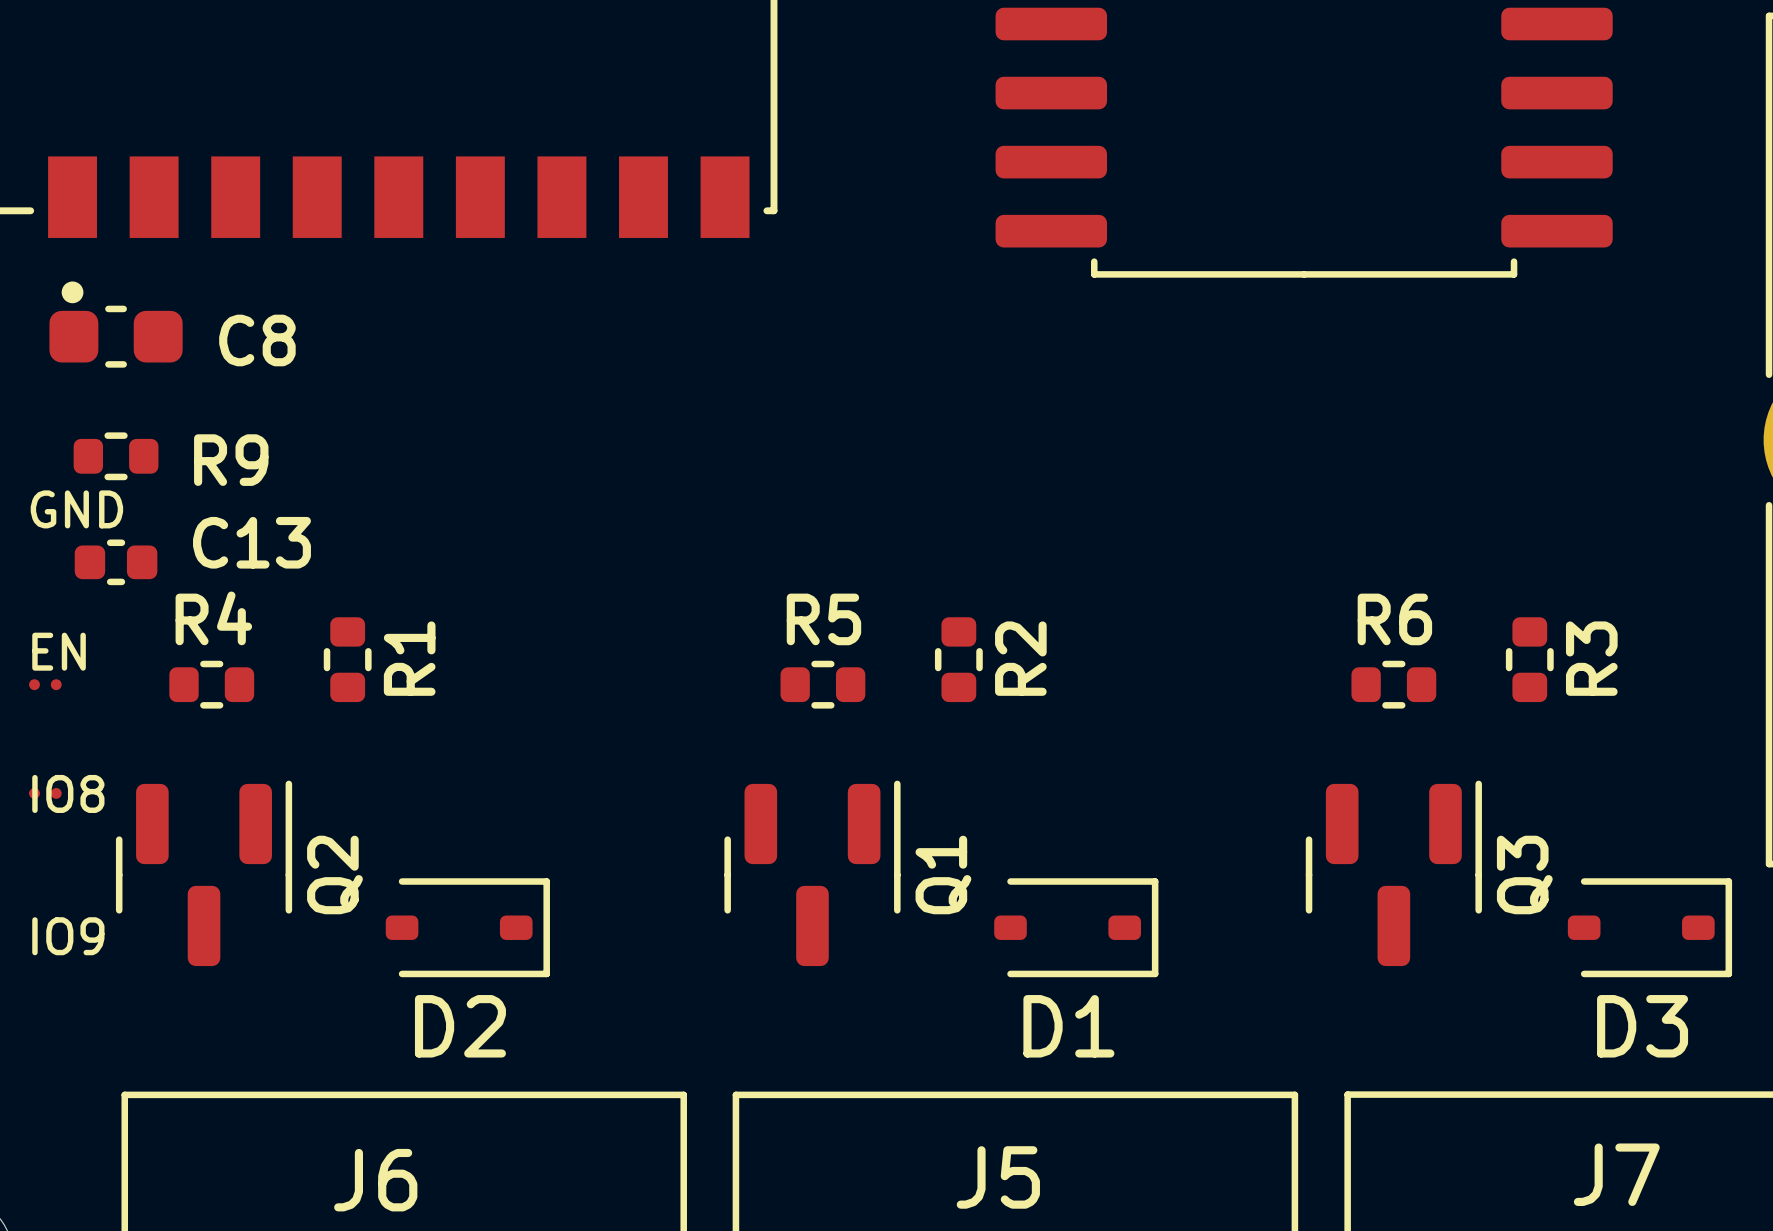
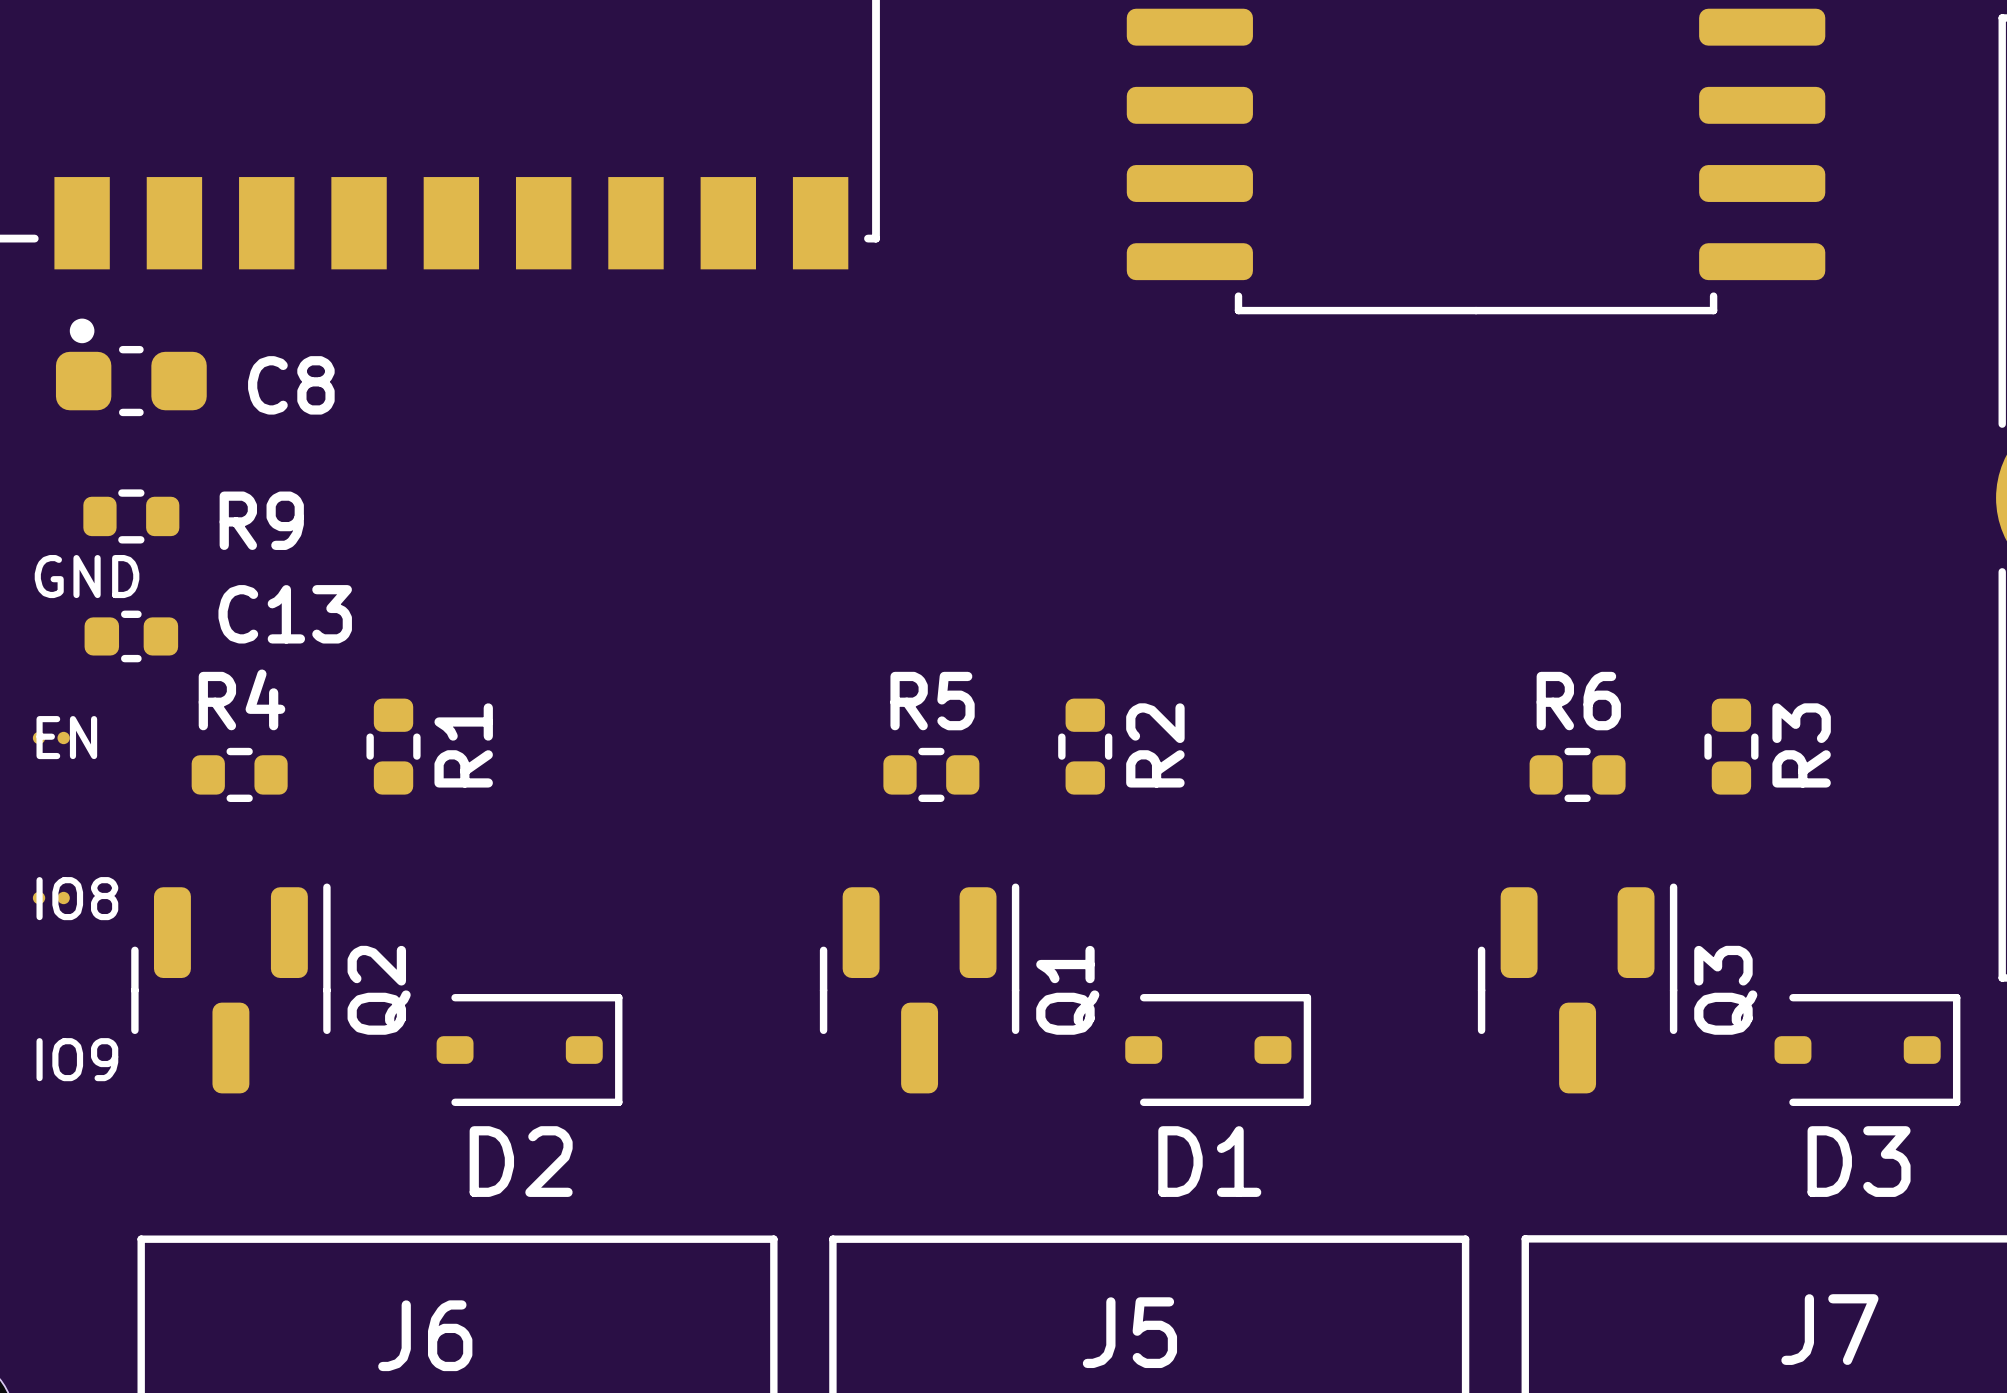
part position: (45, 684) -> (51, 737)

